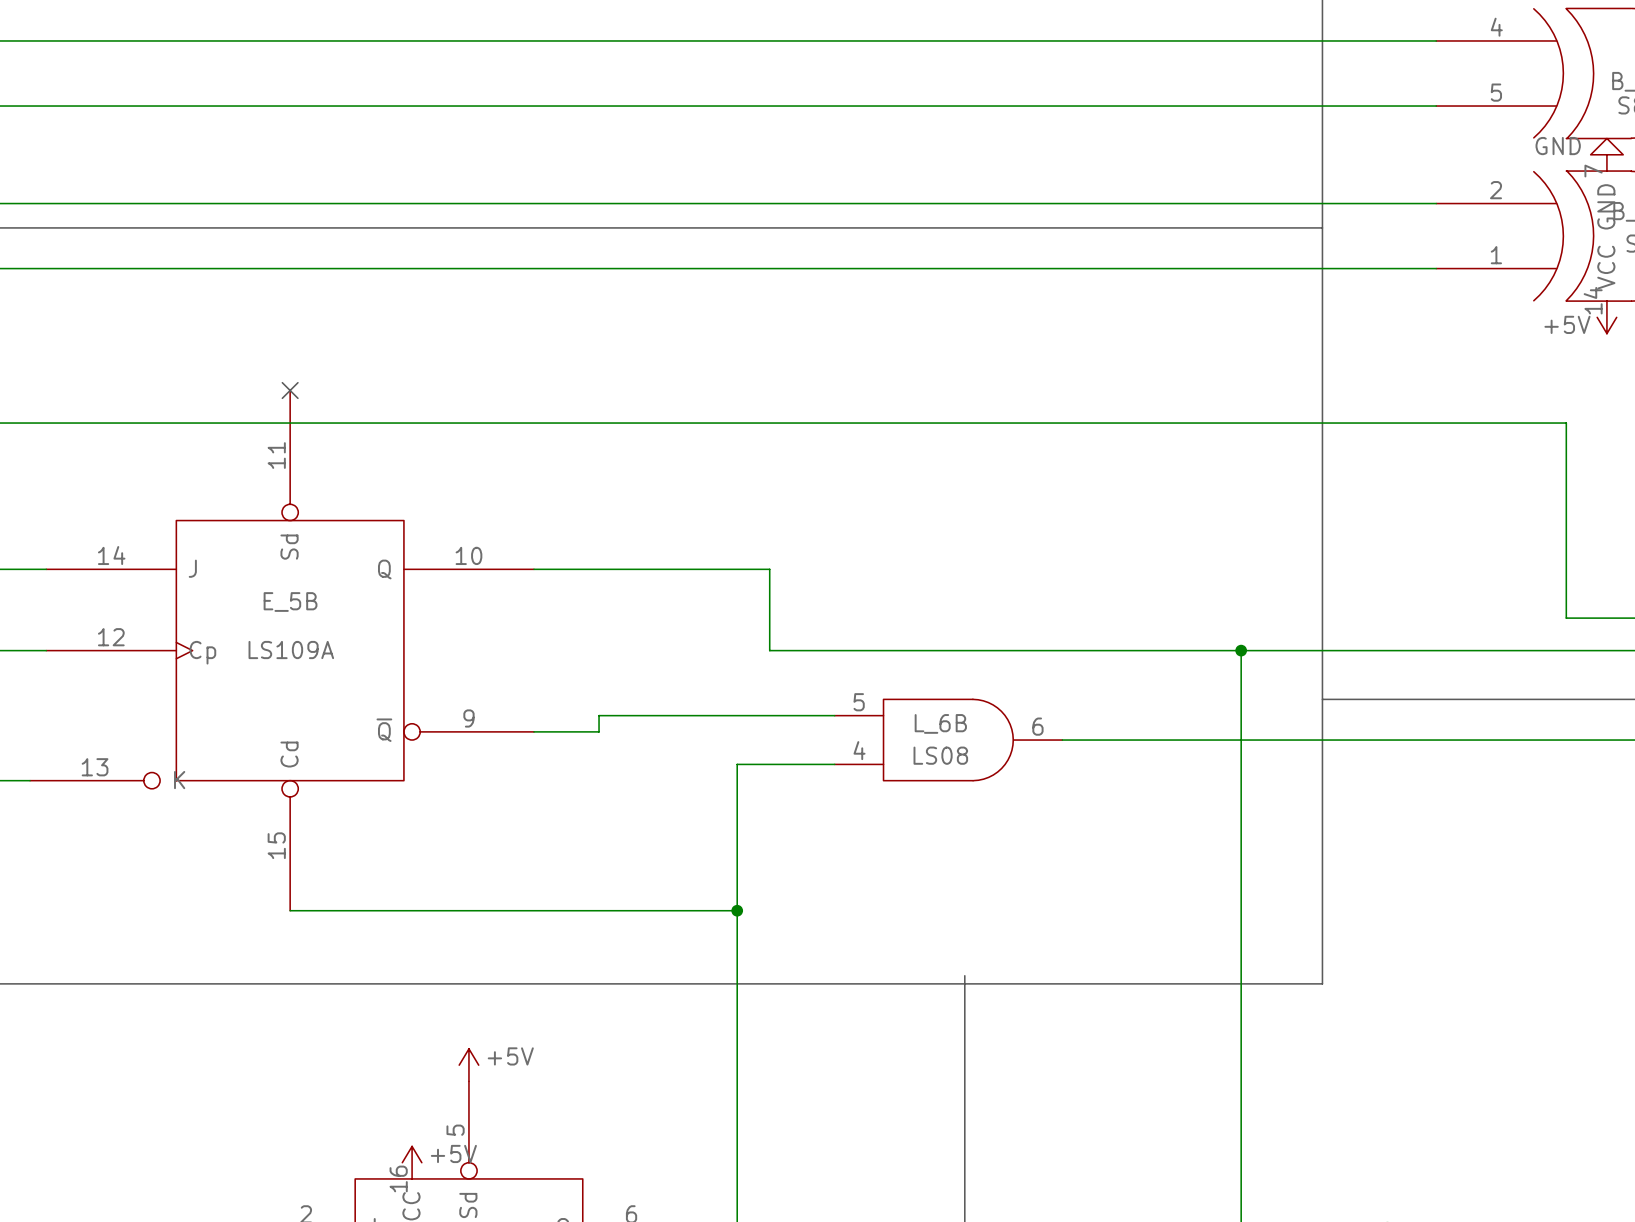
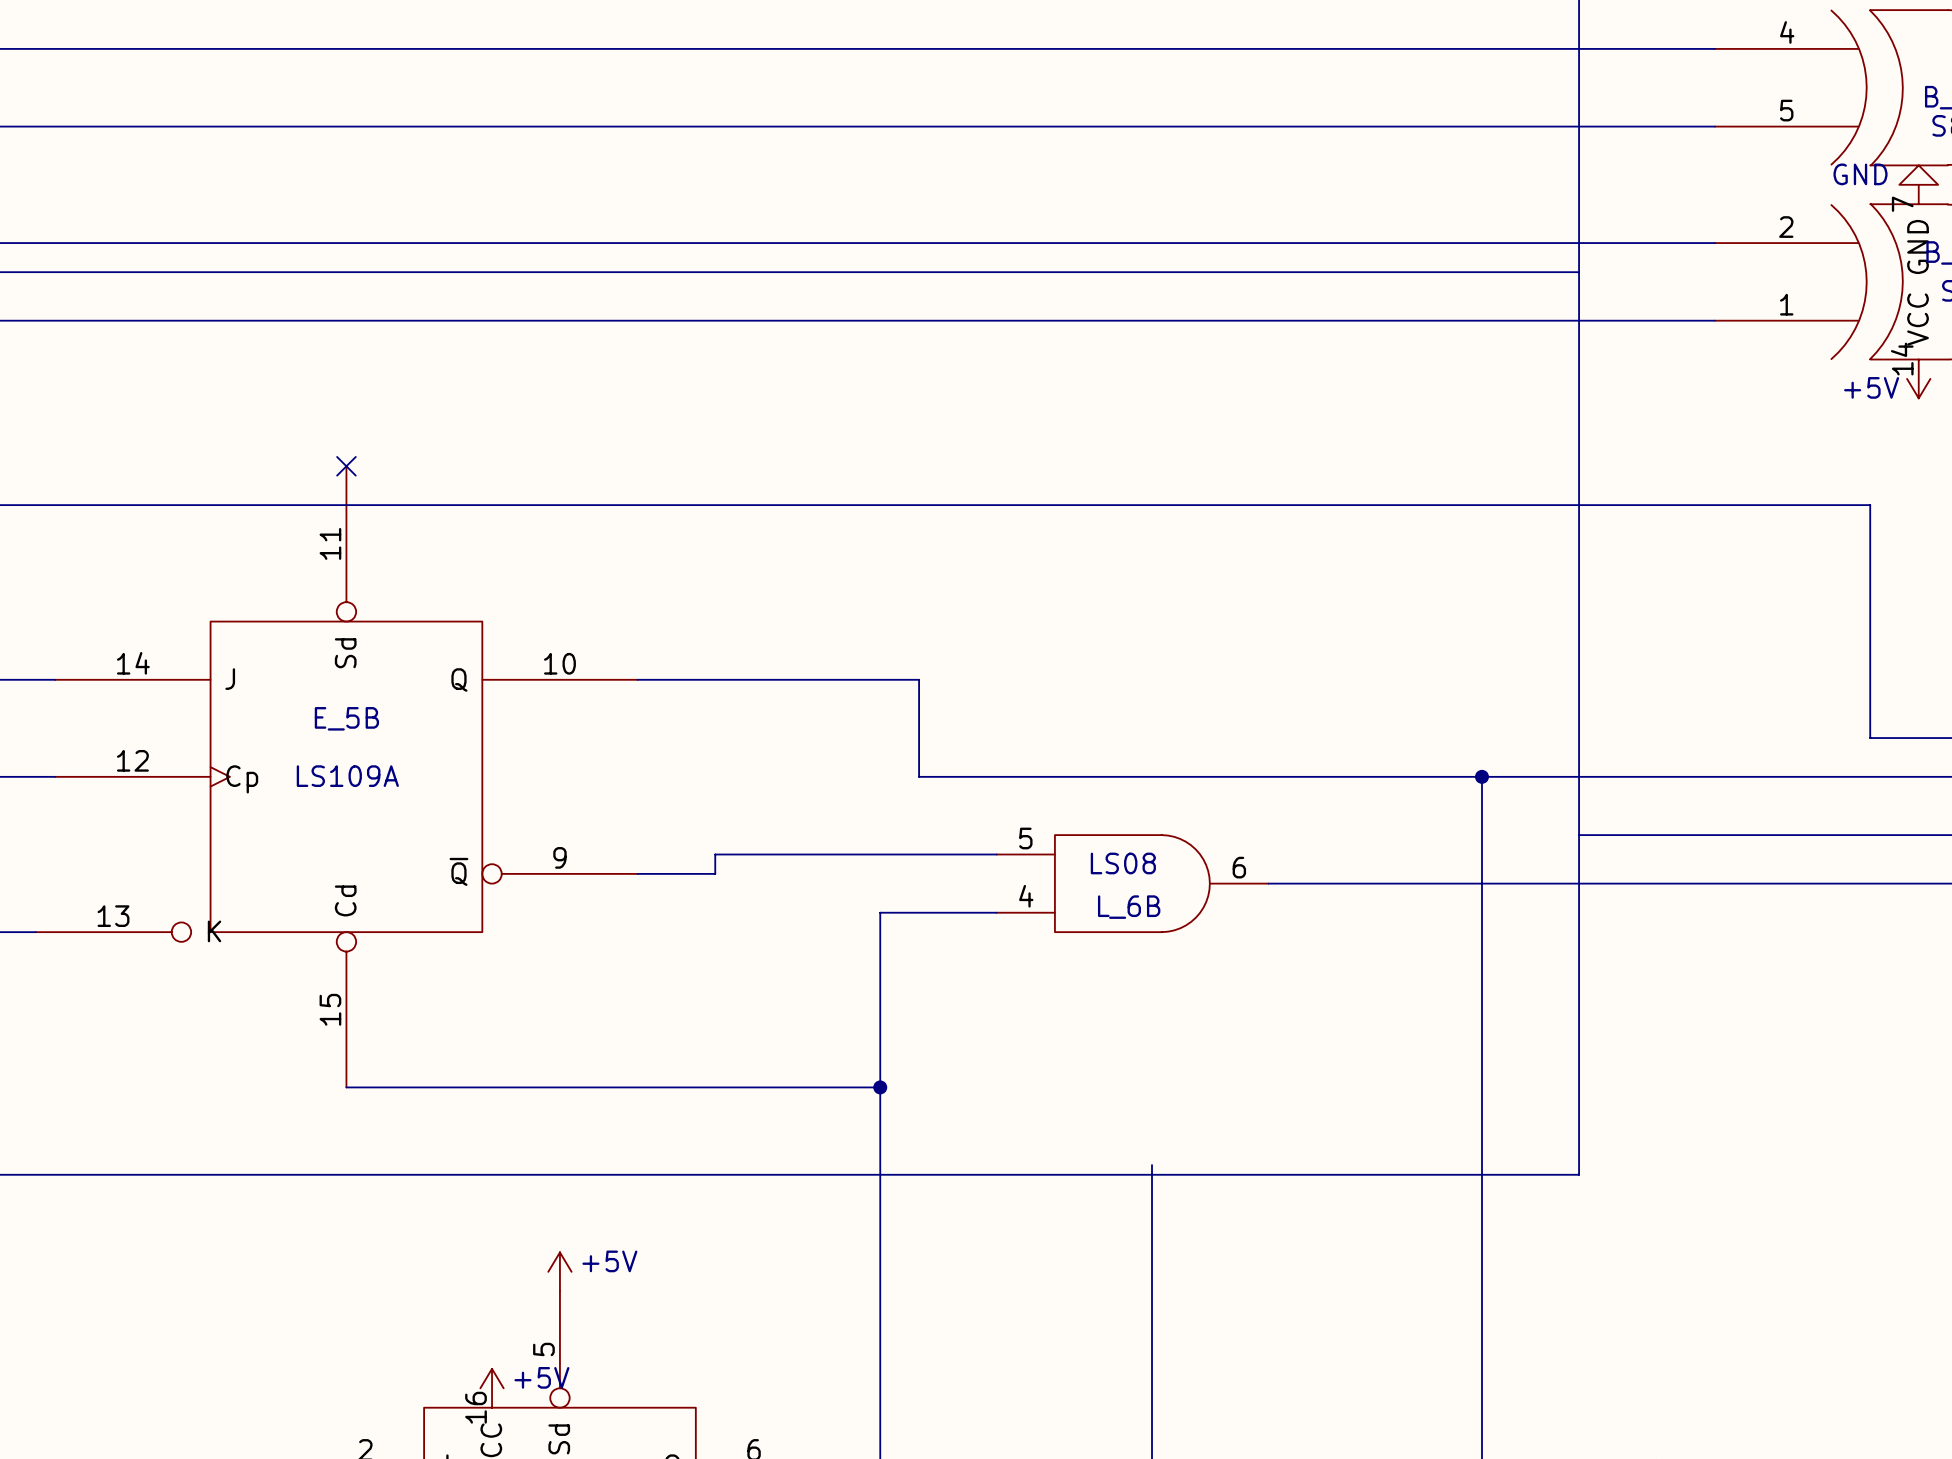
L_6B name position: L_6B (940, 723) -> L_6B (1129, 907)
L_6B value position: LS08 (940, 755) -> LS08 (1123, 863)

